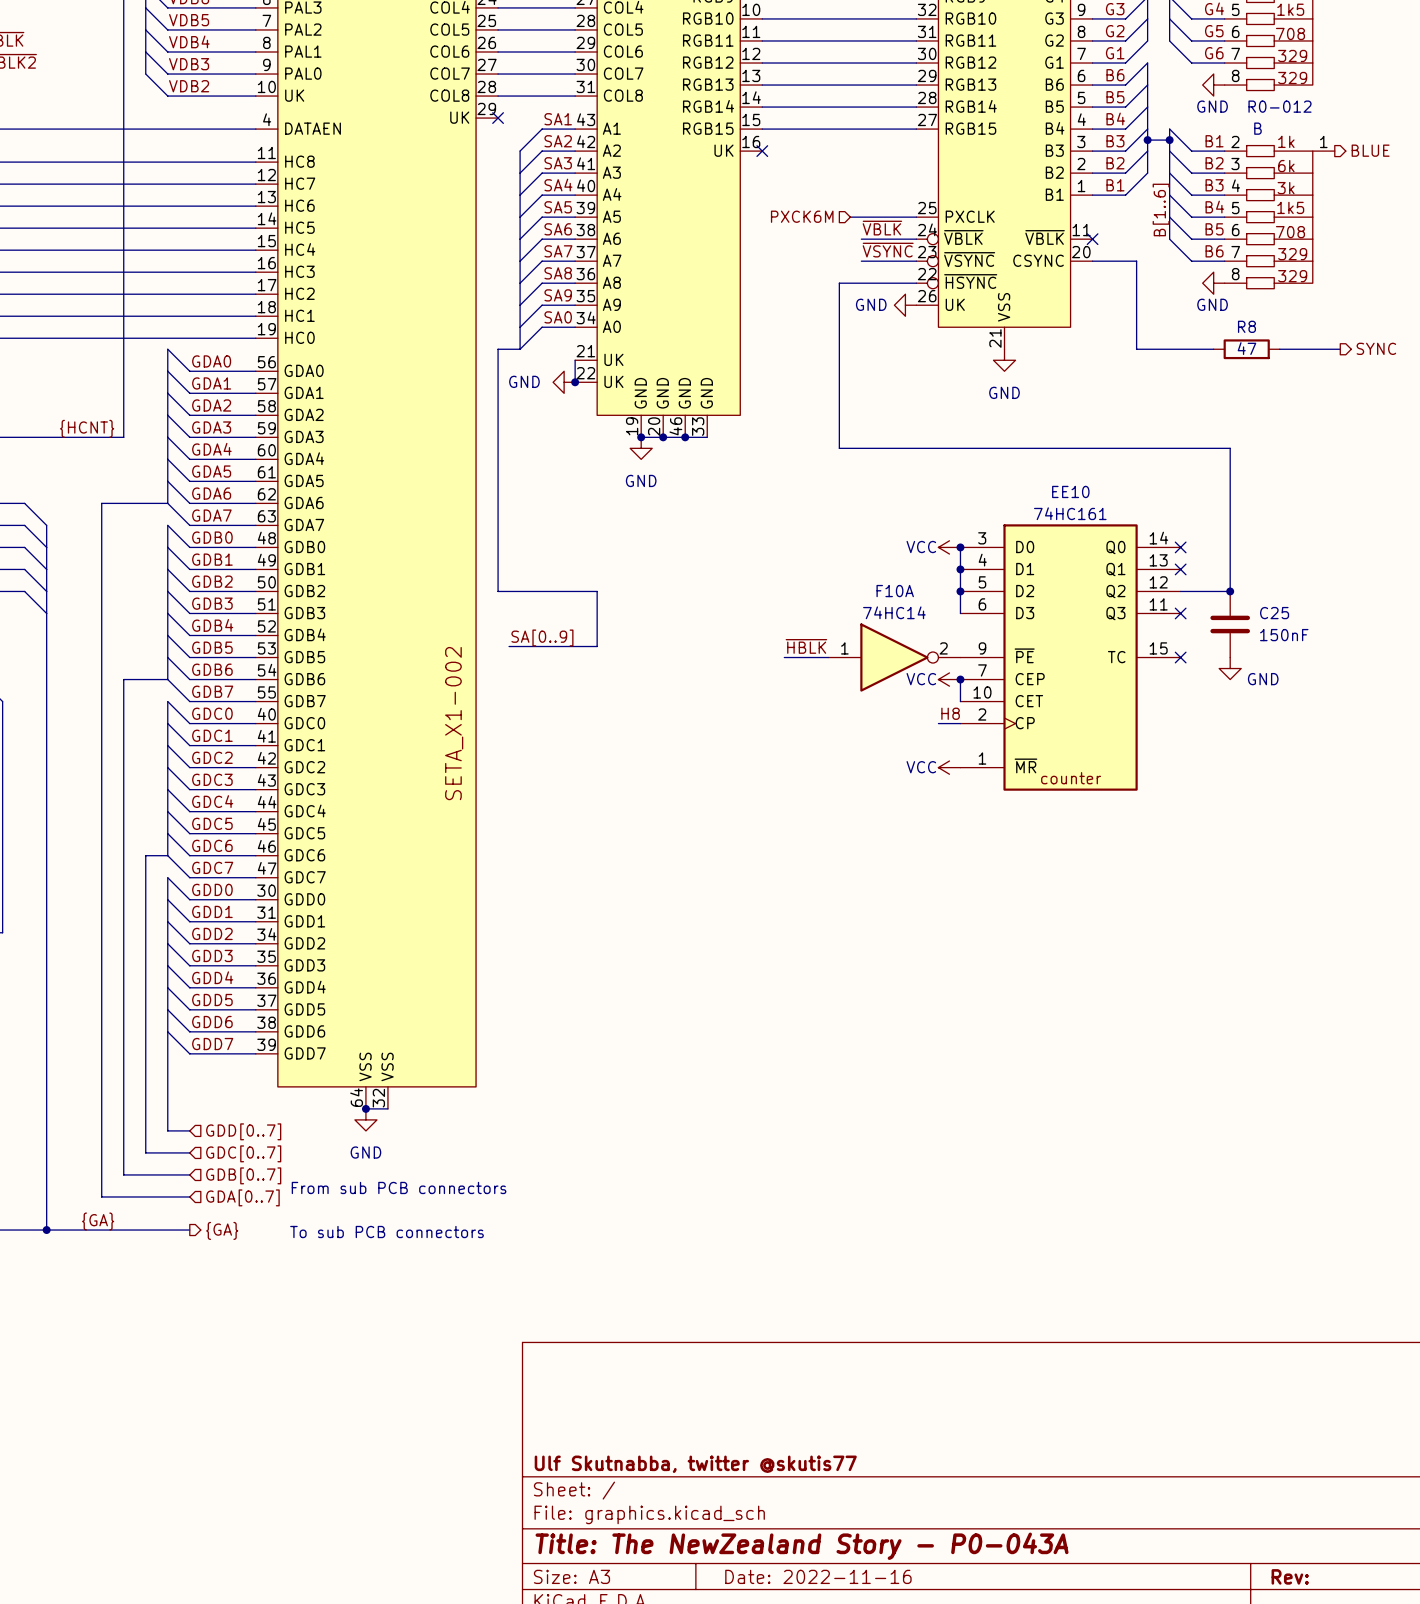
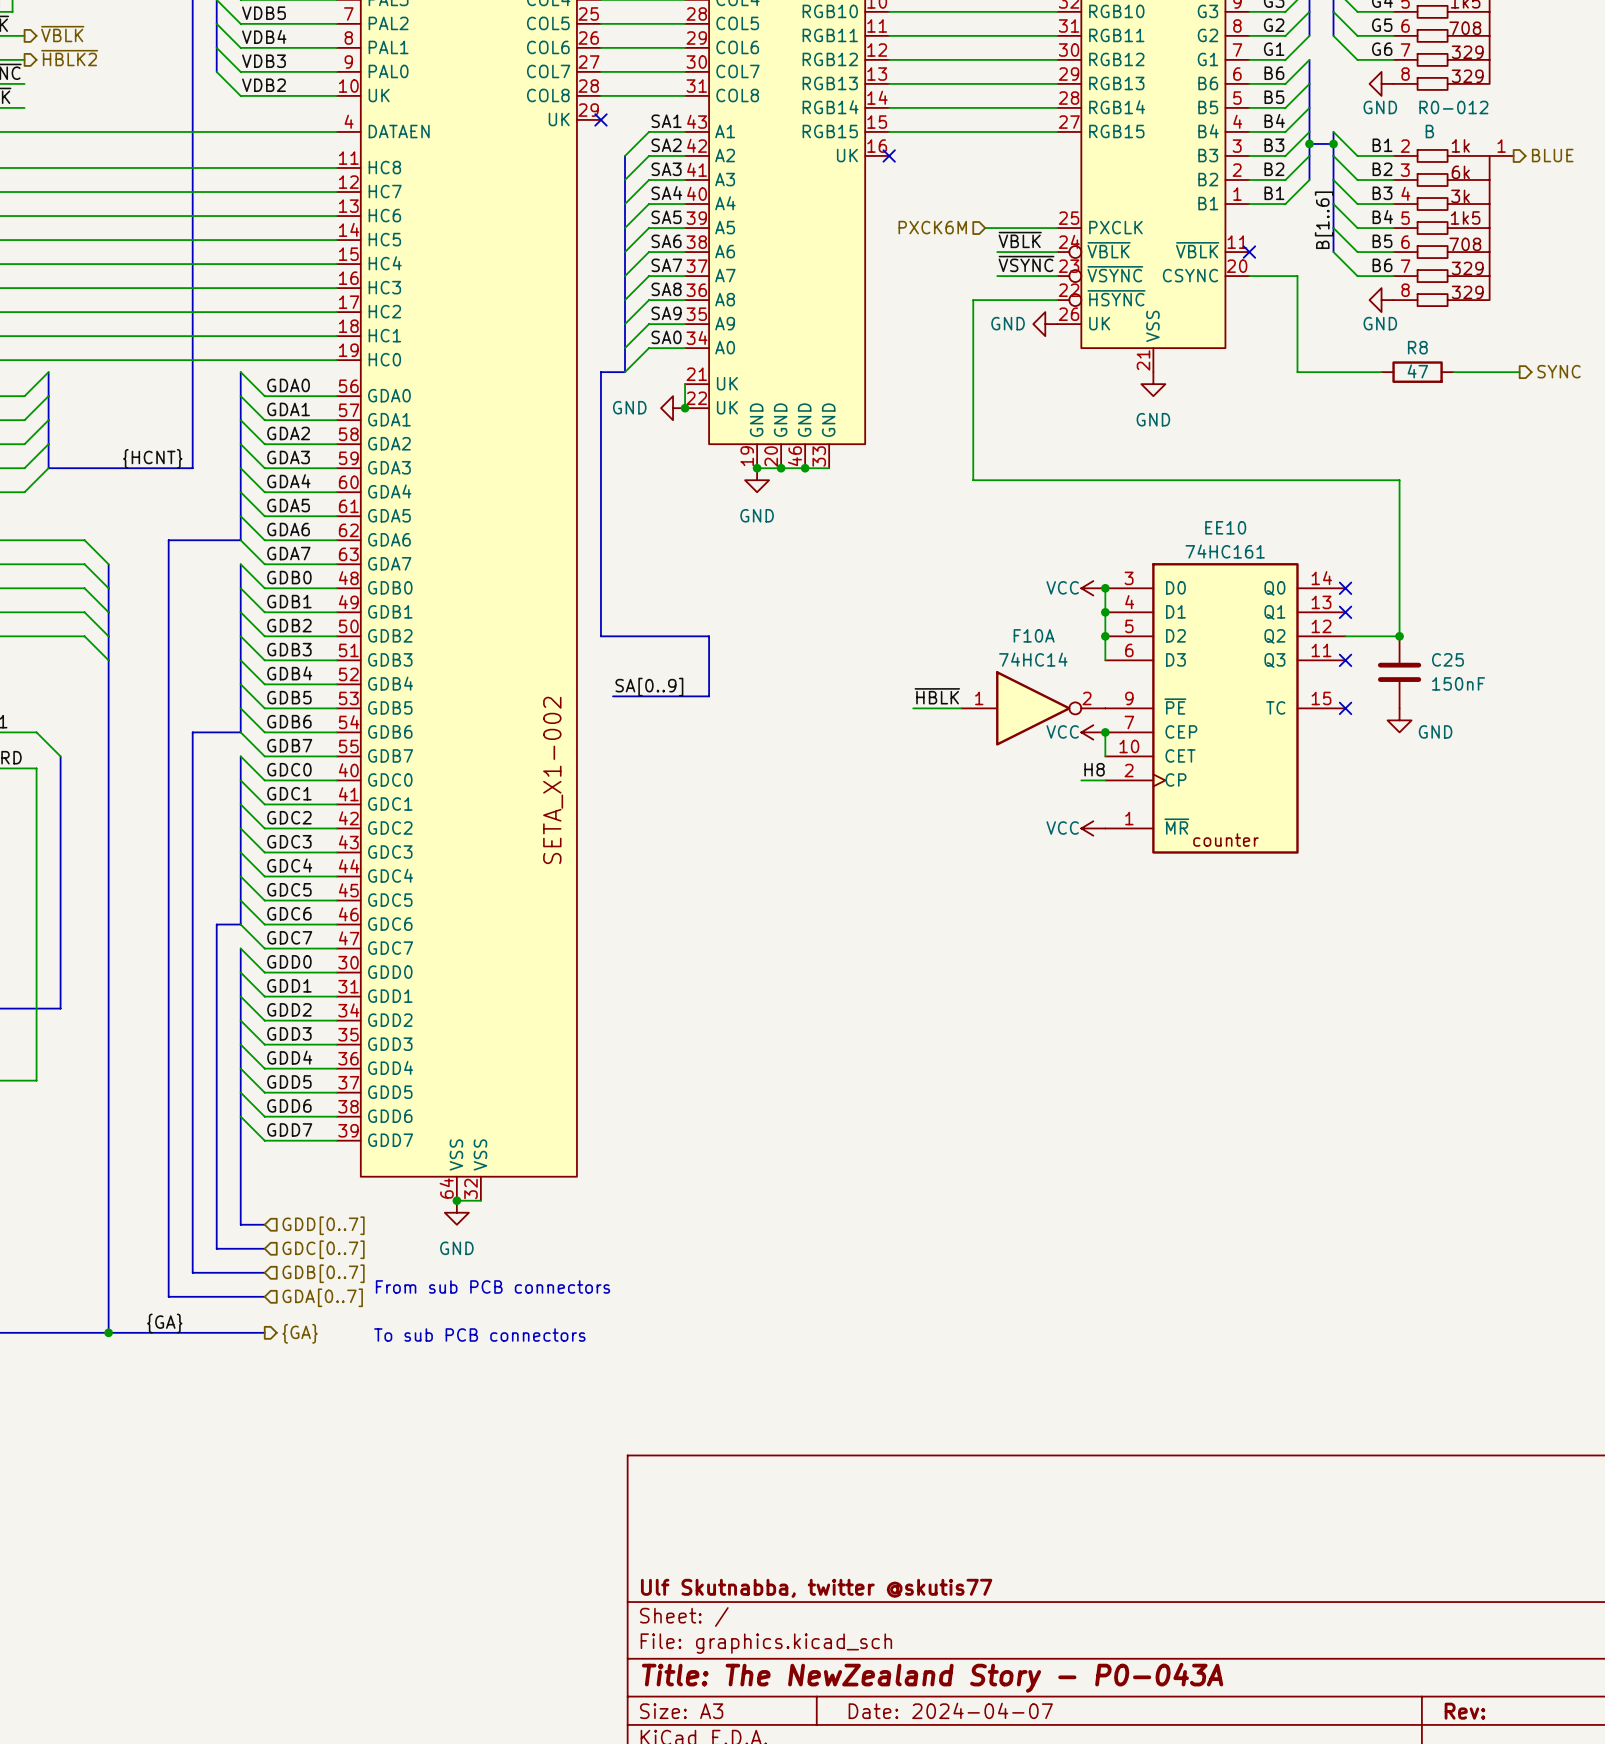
title block: Date: 2022-11-16 (818, 1576) -> Date: 2024-04-07 (950, 1710)

